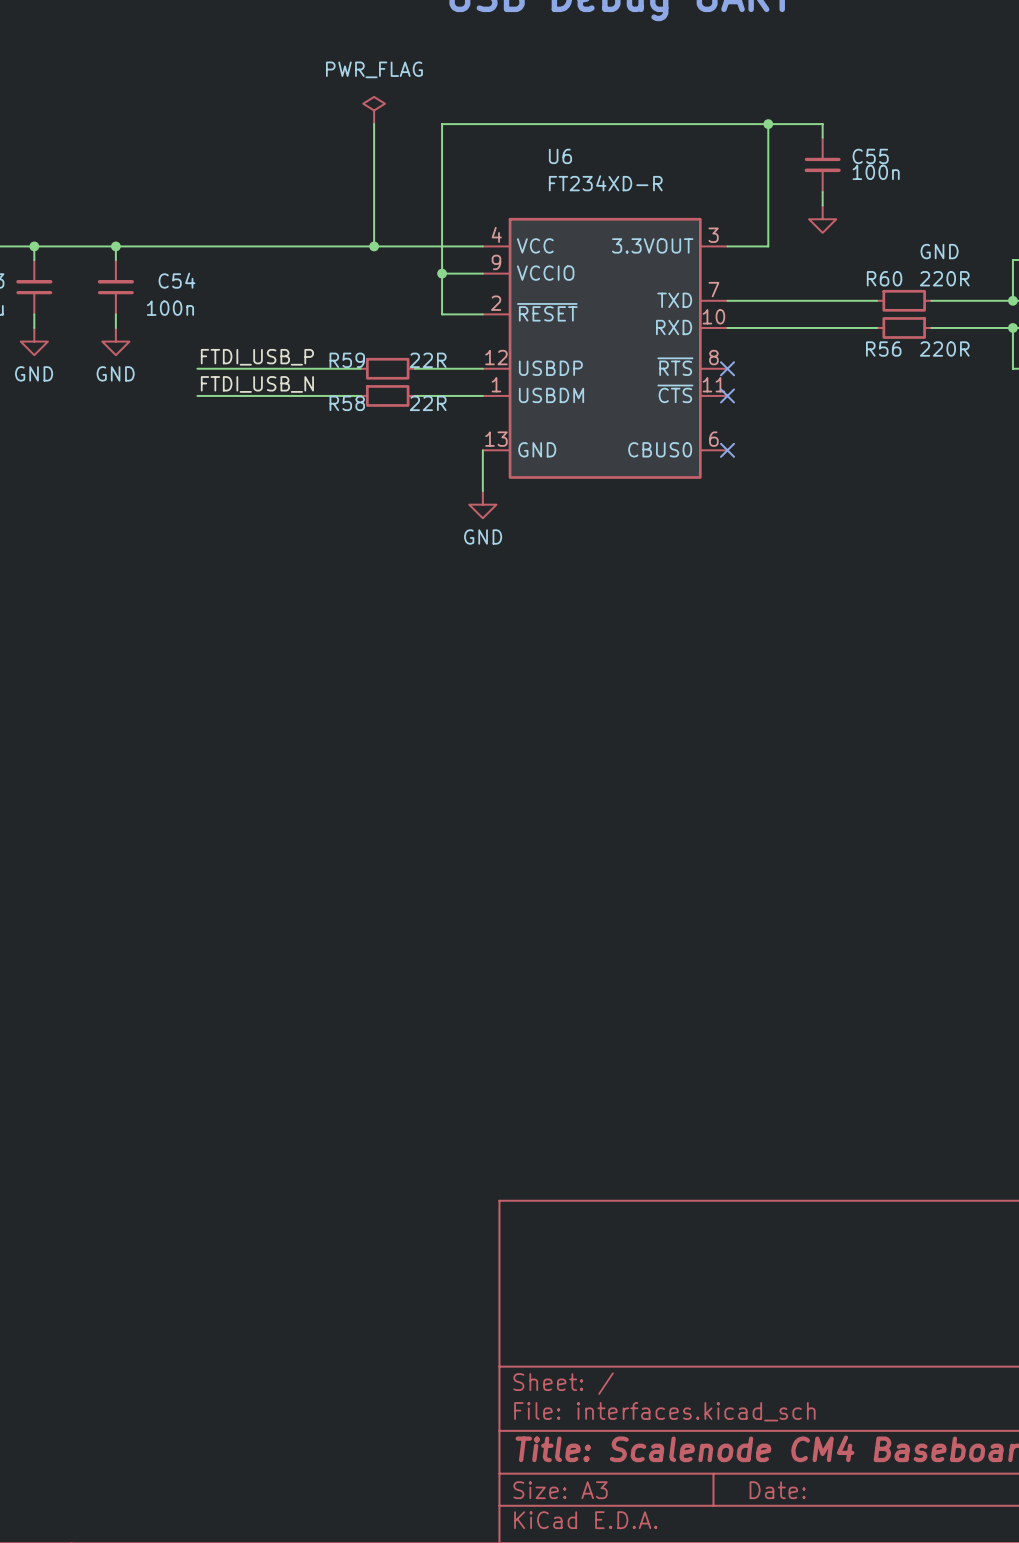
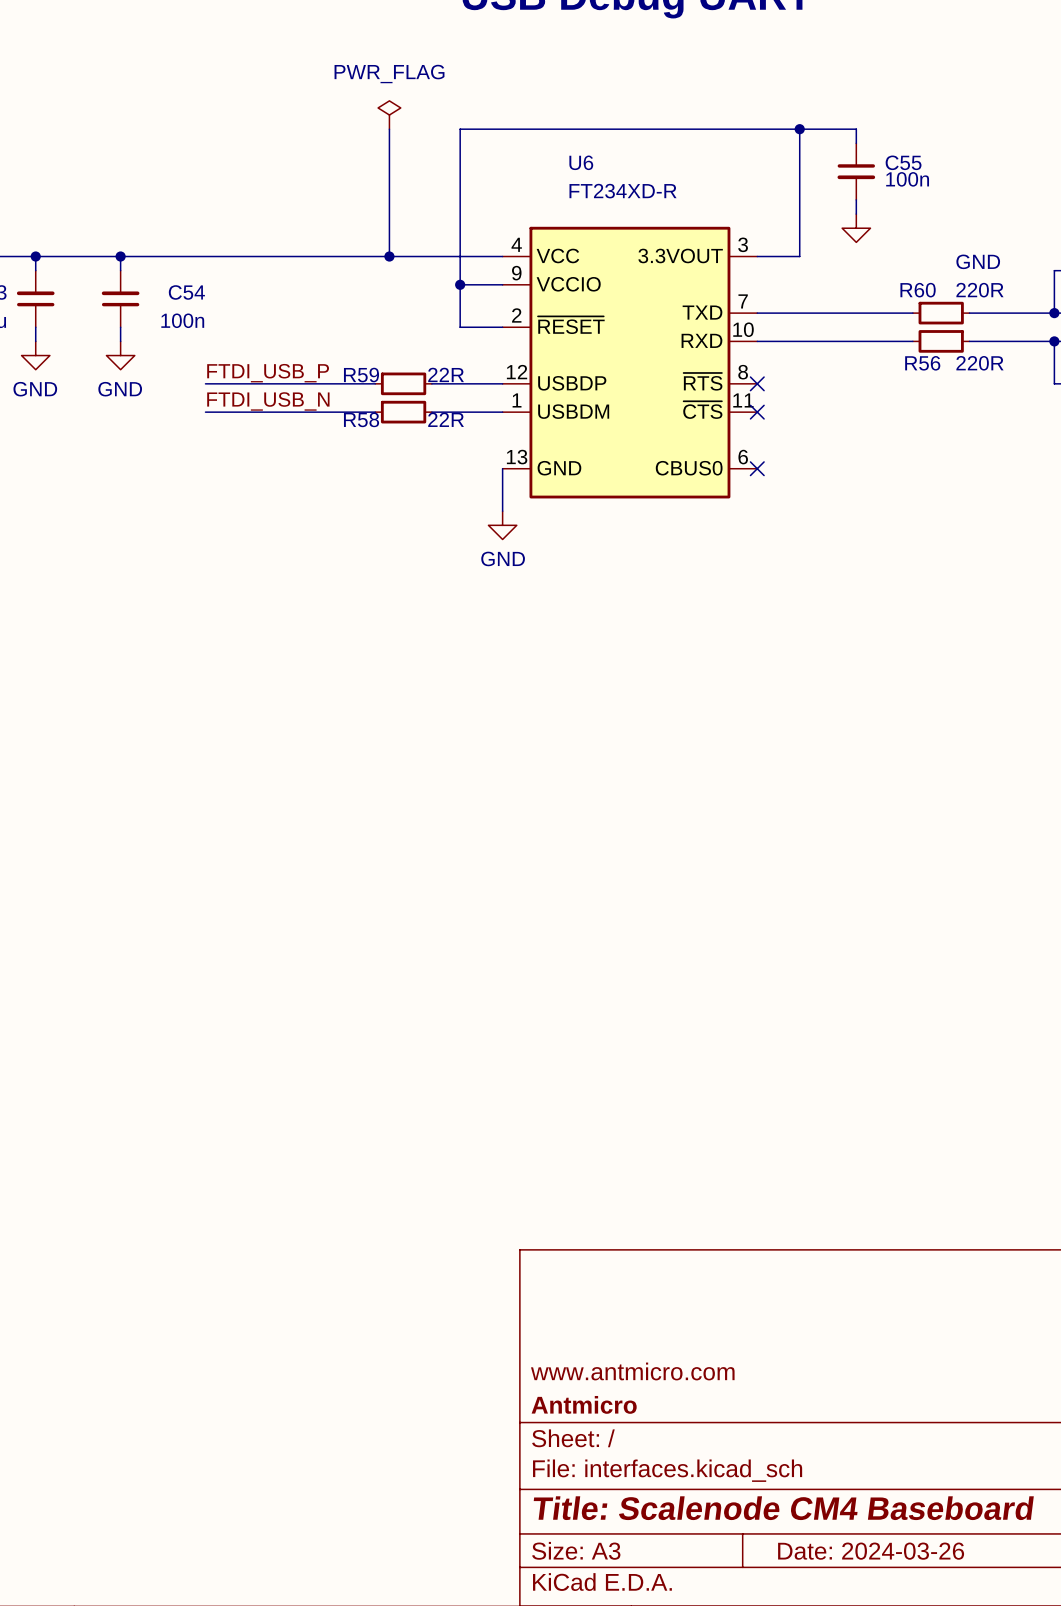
title block: none -> www.antmicro.com (632, 1371)
title block: none -> Antmicro (584, 1404)
title block: Date: (777, 1490) -> Date: 2024-03-26 (871, 1551)

